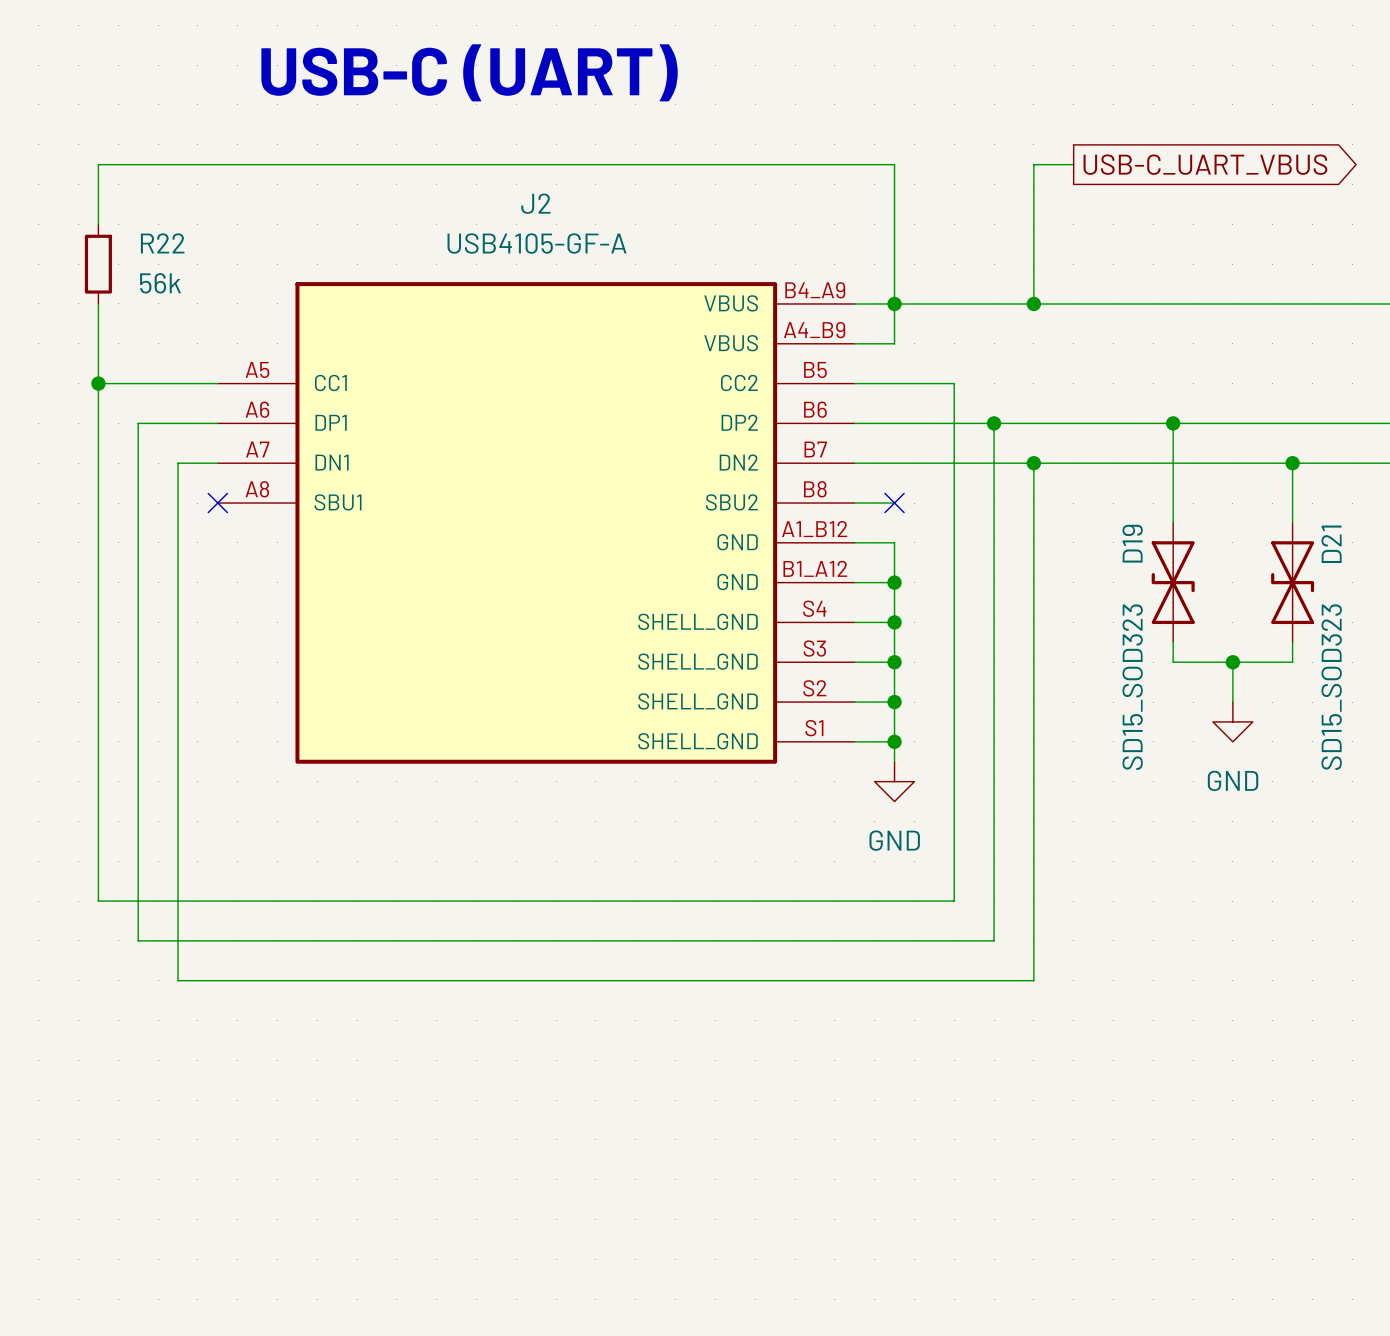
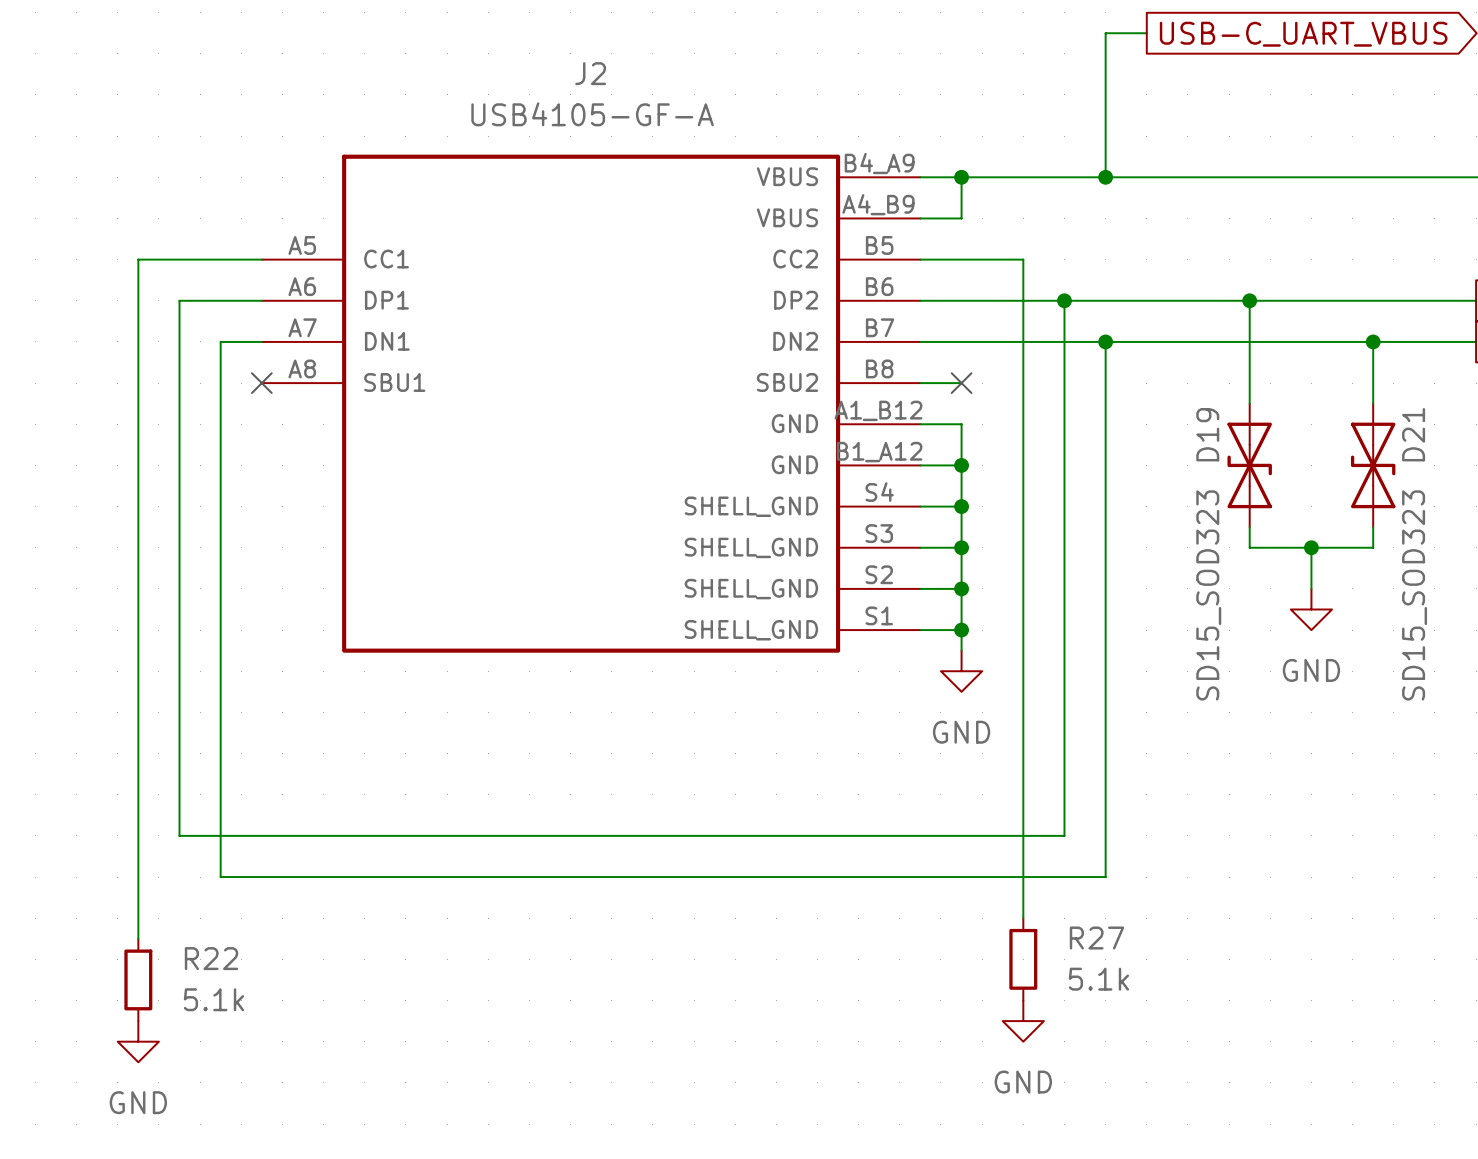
wire: (98, 224) (98, 164) (894, 164) (894, 303) -> none
R22 position: (98, 264) -> (138, 979)
R22 value: 56k (160, 283) -> 5.1k (213, 999)
wire: (98, 303) (98, 383) -> none
junction: (98, 383) -> none
wire: (98, 901) (954, 901) -> (1023, 918) (1023, 794)
wire: none -> (138, 794) (138, 938)
R27: none -> 5.1k (1023, 959)
power symbol: none -> GND (1023, 1021)
power symbol: none -> GND (138, 1041)

